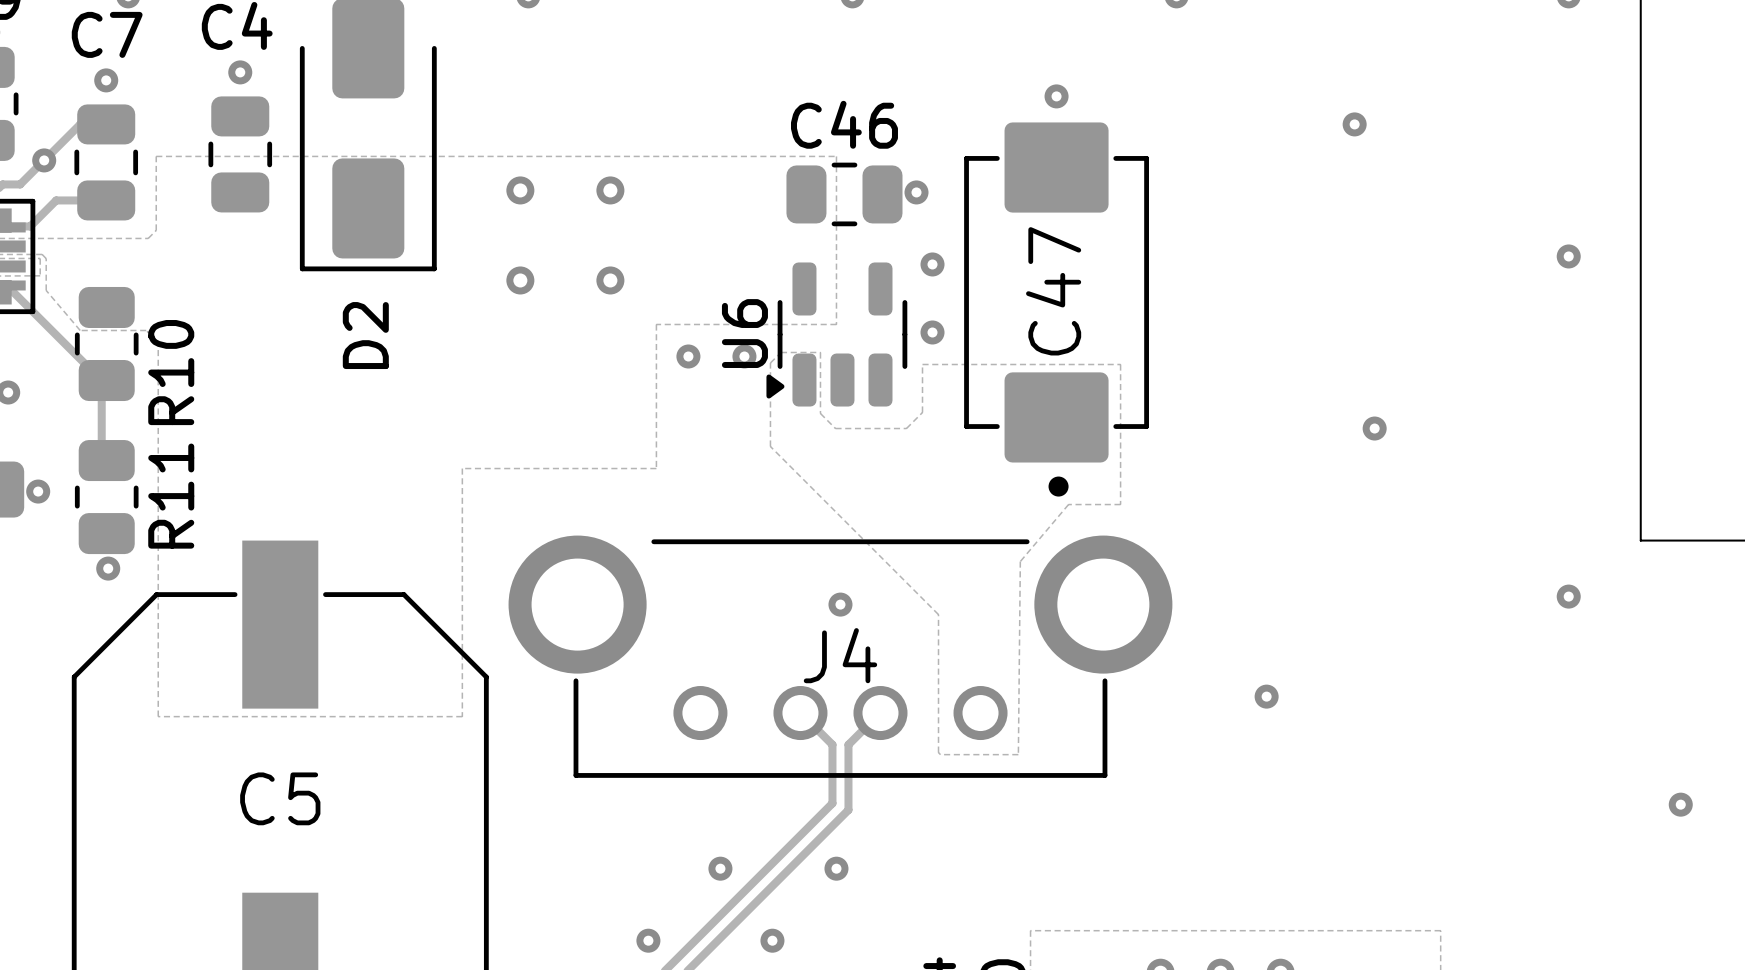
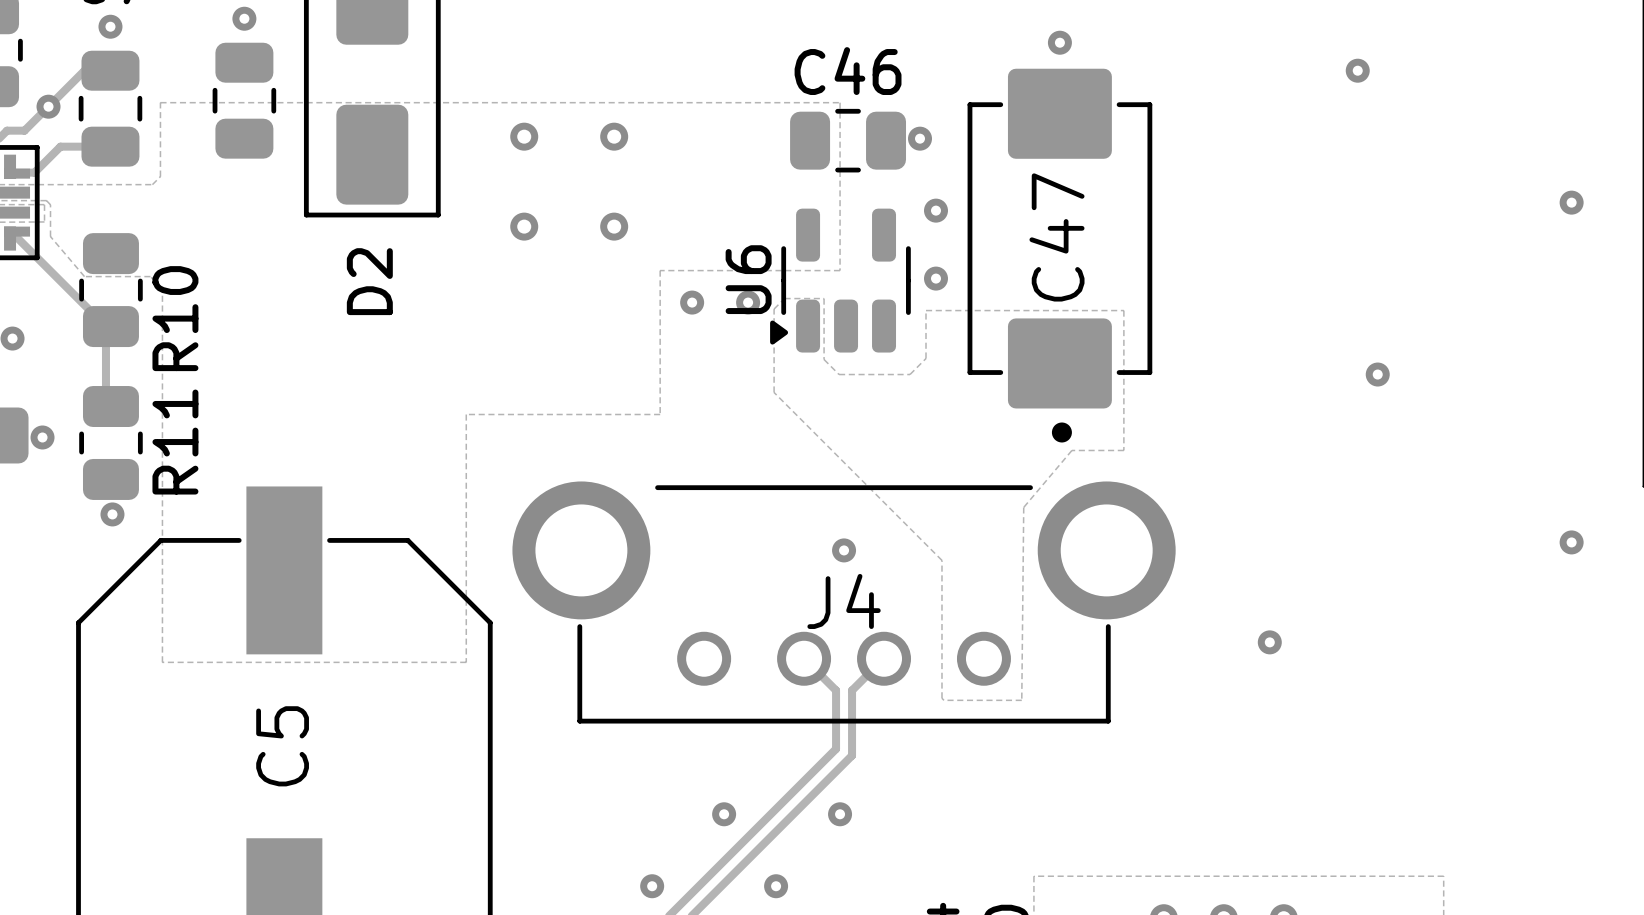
C5 name rotation: 0° (280, 798) -> 90° counterclockwise (282, 746)

